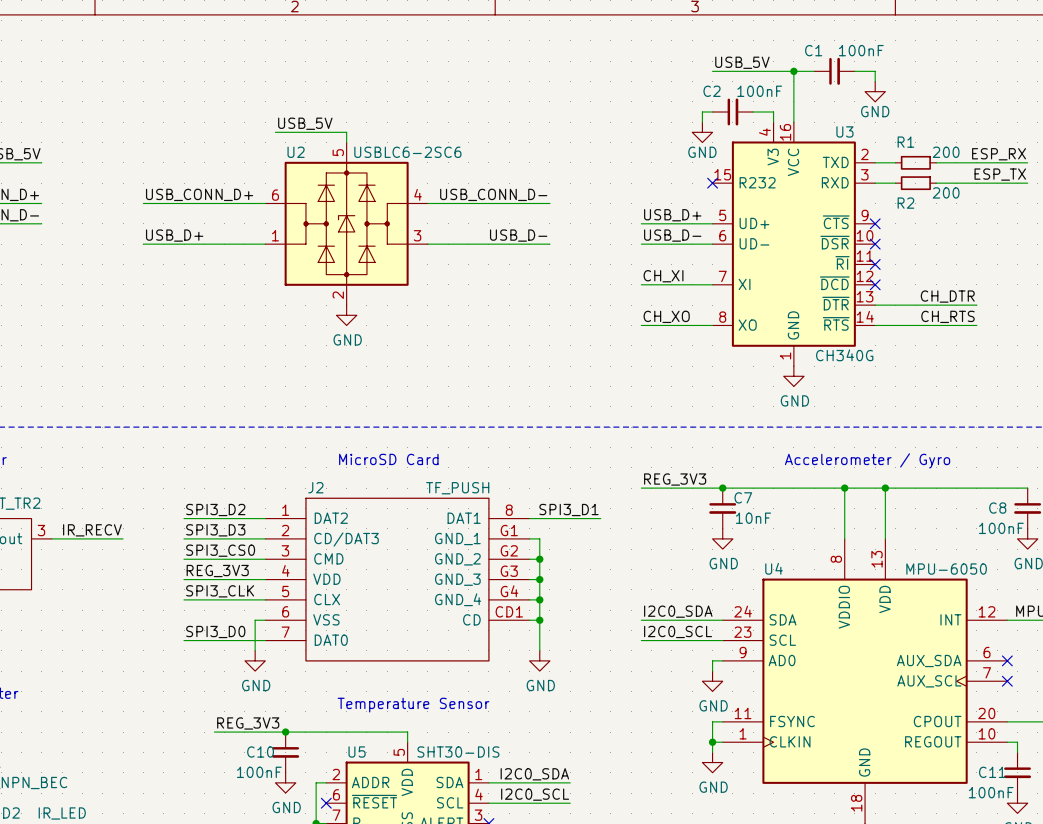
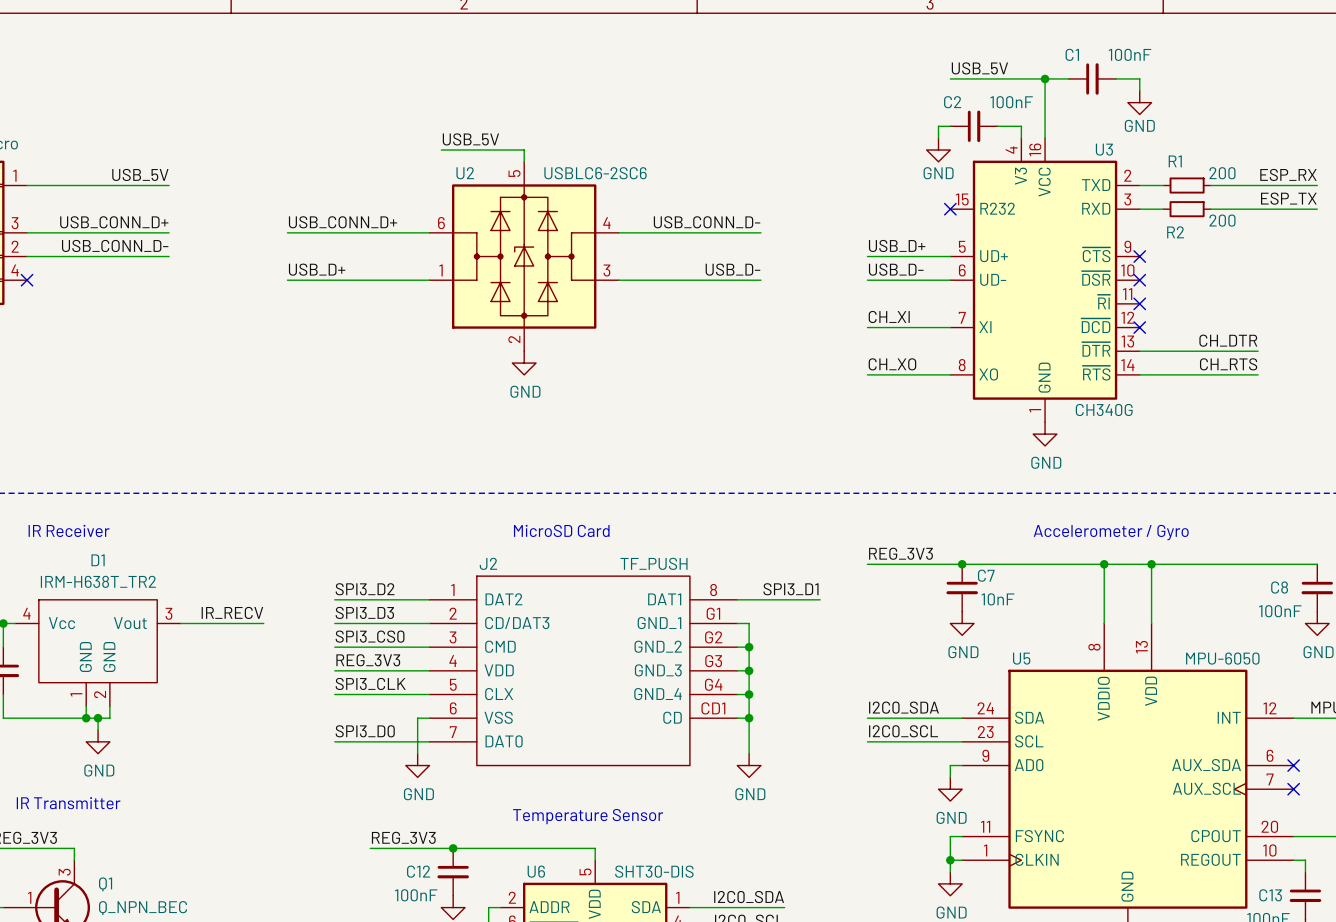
U4 name: U4 (774, 568) -> U5 (1021, 658)
C10 name: C10 (260, 752) -> C12 (418, 871)
U5 name: U5 (357, 752) -> U6 (536, 871)
C11 name: C11 (992, 772) -> C13 (1270, 895)

